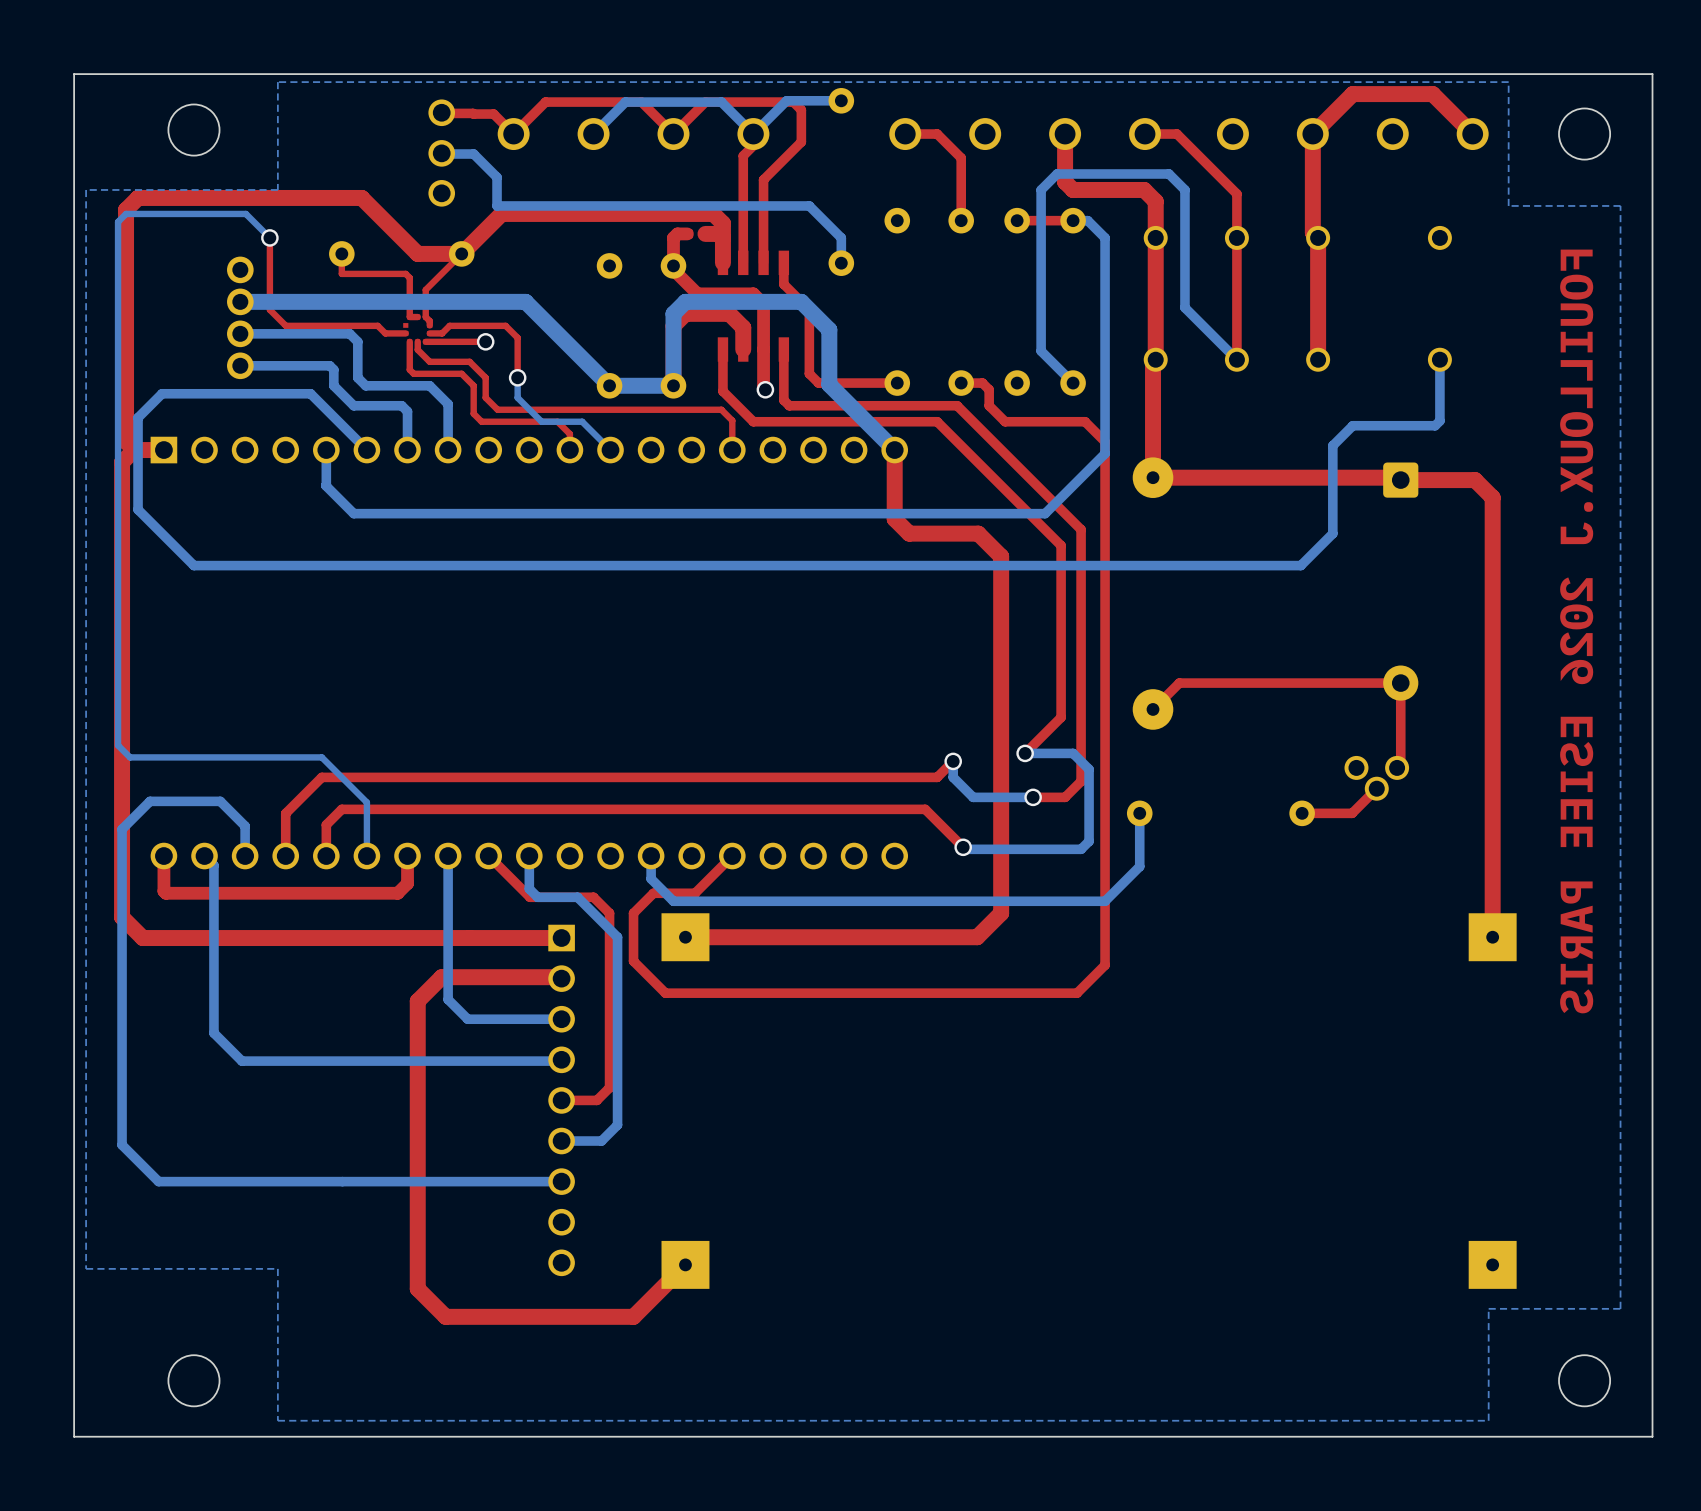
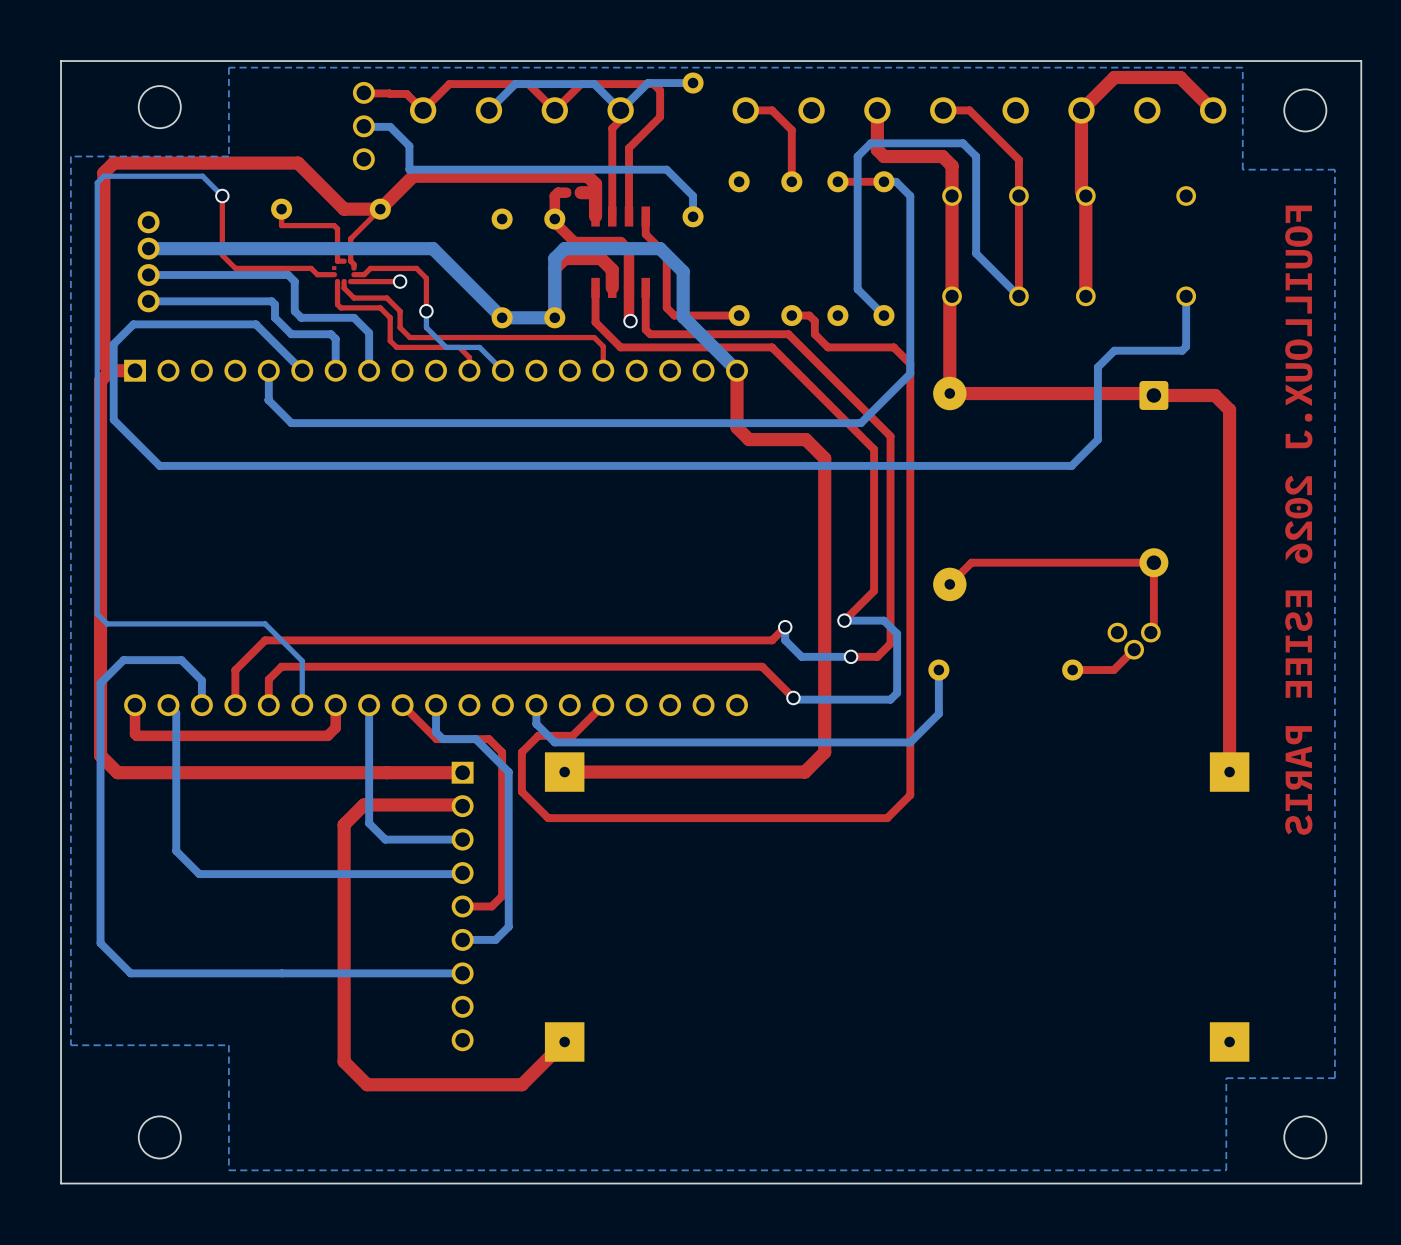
bottom track: none -> (197, 248) (148, 248)
part position: (240, 317) -> (148, 261)
bottom track: none -> (197, 275) (148, 275)
bottom track: none -> (197, 301) (148, 301)

